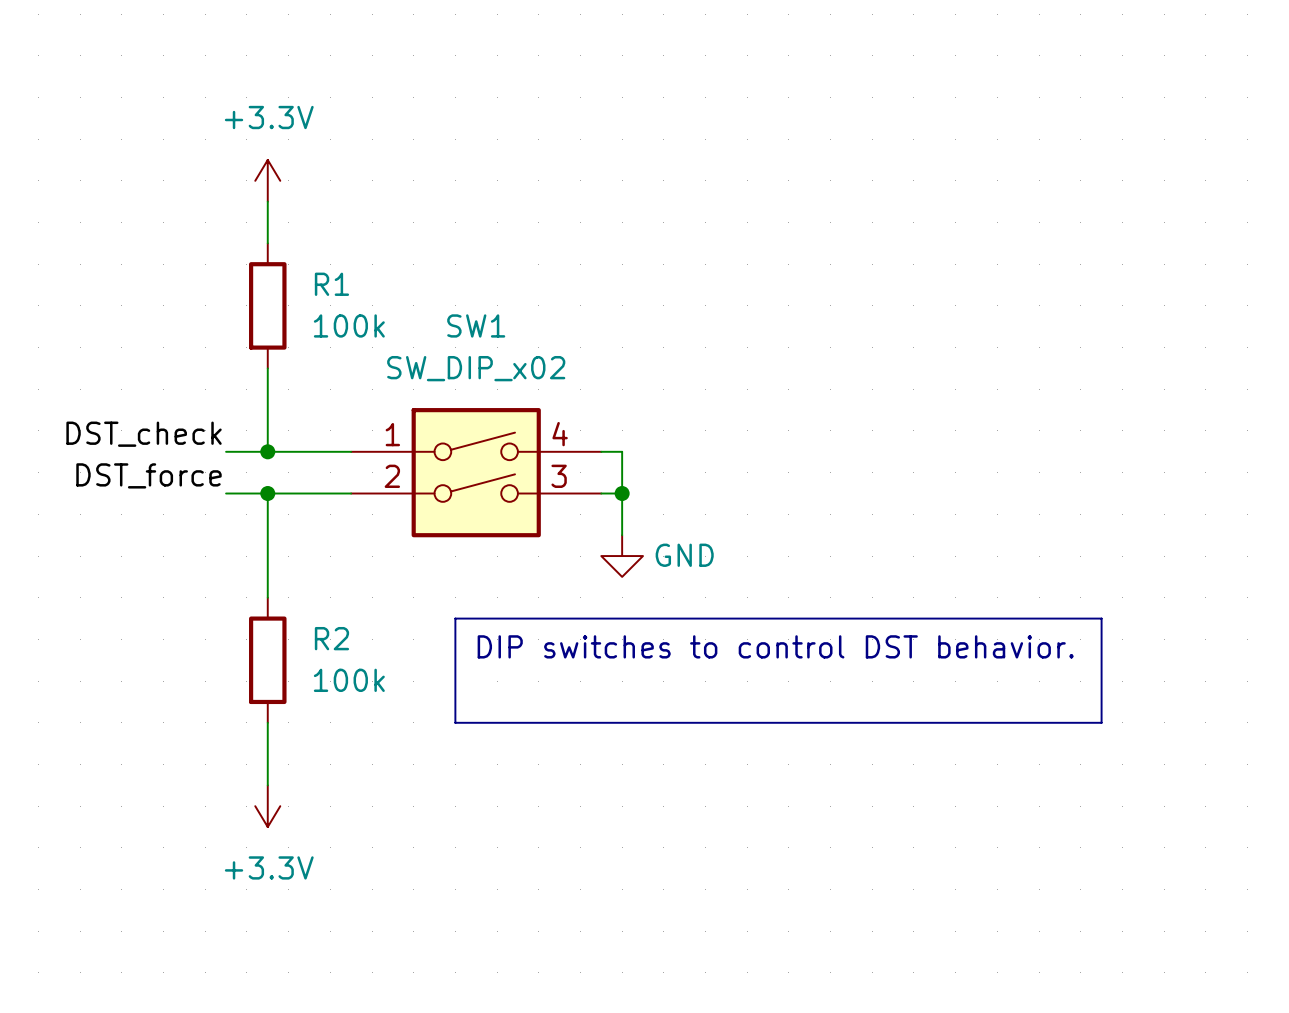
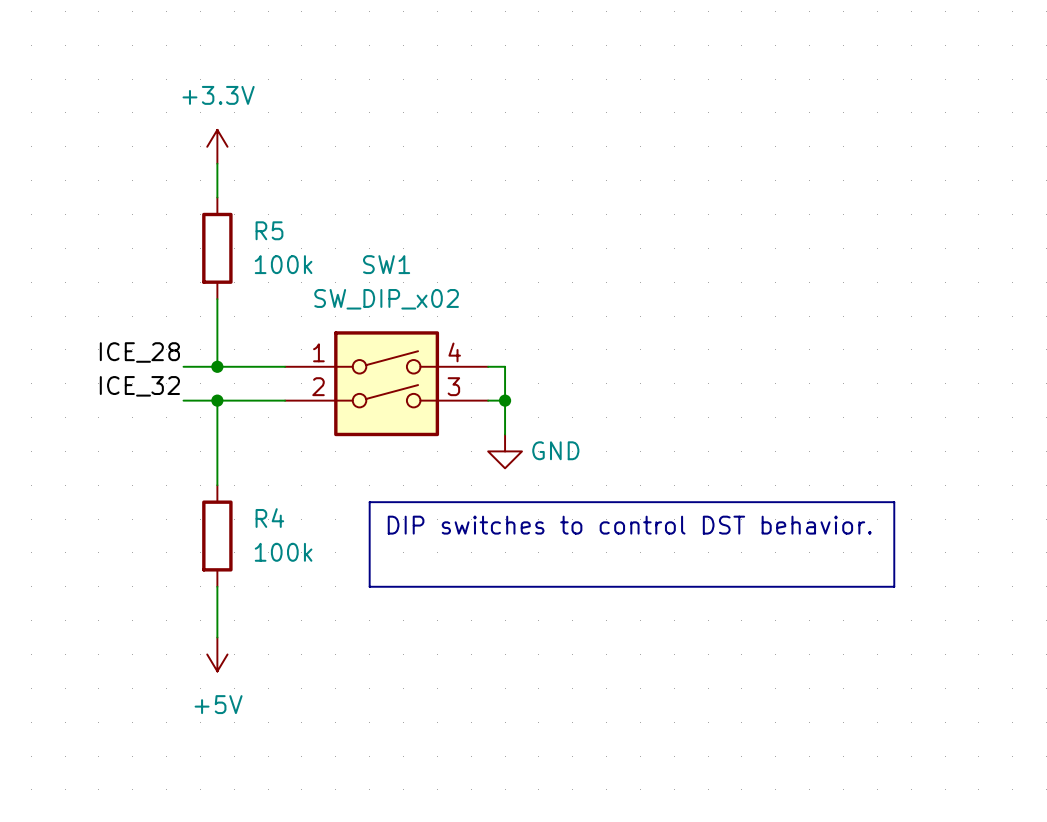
R1 name: R1 (331, 284) -> R5 (269, 230)
label: DST_check (144, 434) -> ICE_28 (139, 352)
label: DST_force (149, 475) -> ICE_32 (139, 386)
R2 name: R2 (331, 638) -> R4 (269, 518)
power symbol: +3.3V (267, 806) -> +5V (217, 654)

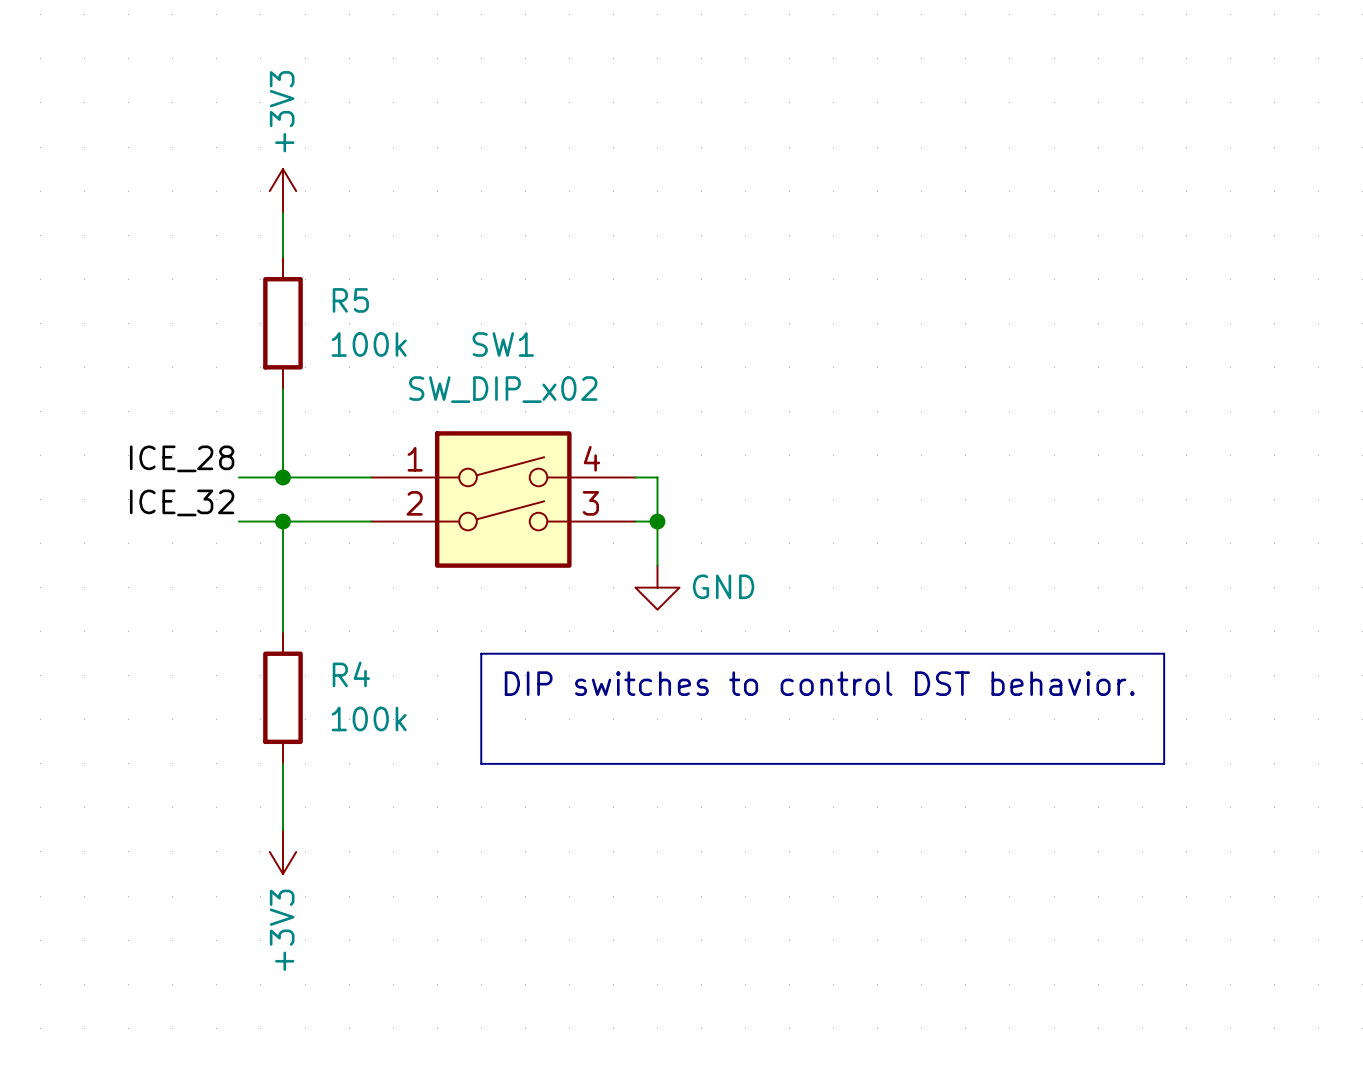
power symbol: +3.3V (217, 146) -> +3V3 (282, 191)
power symbol: +5V (217, 654) -> +3V3 (282, 851)

